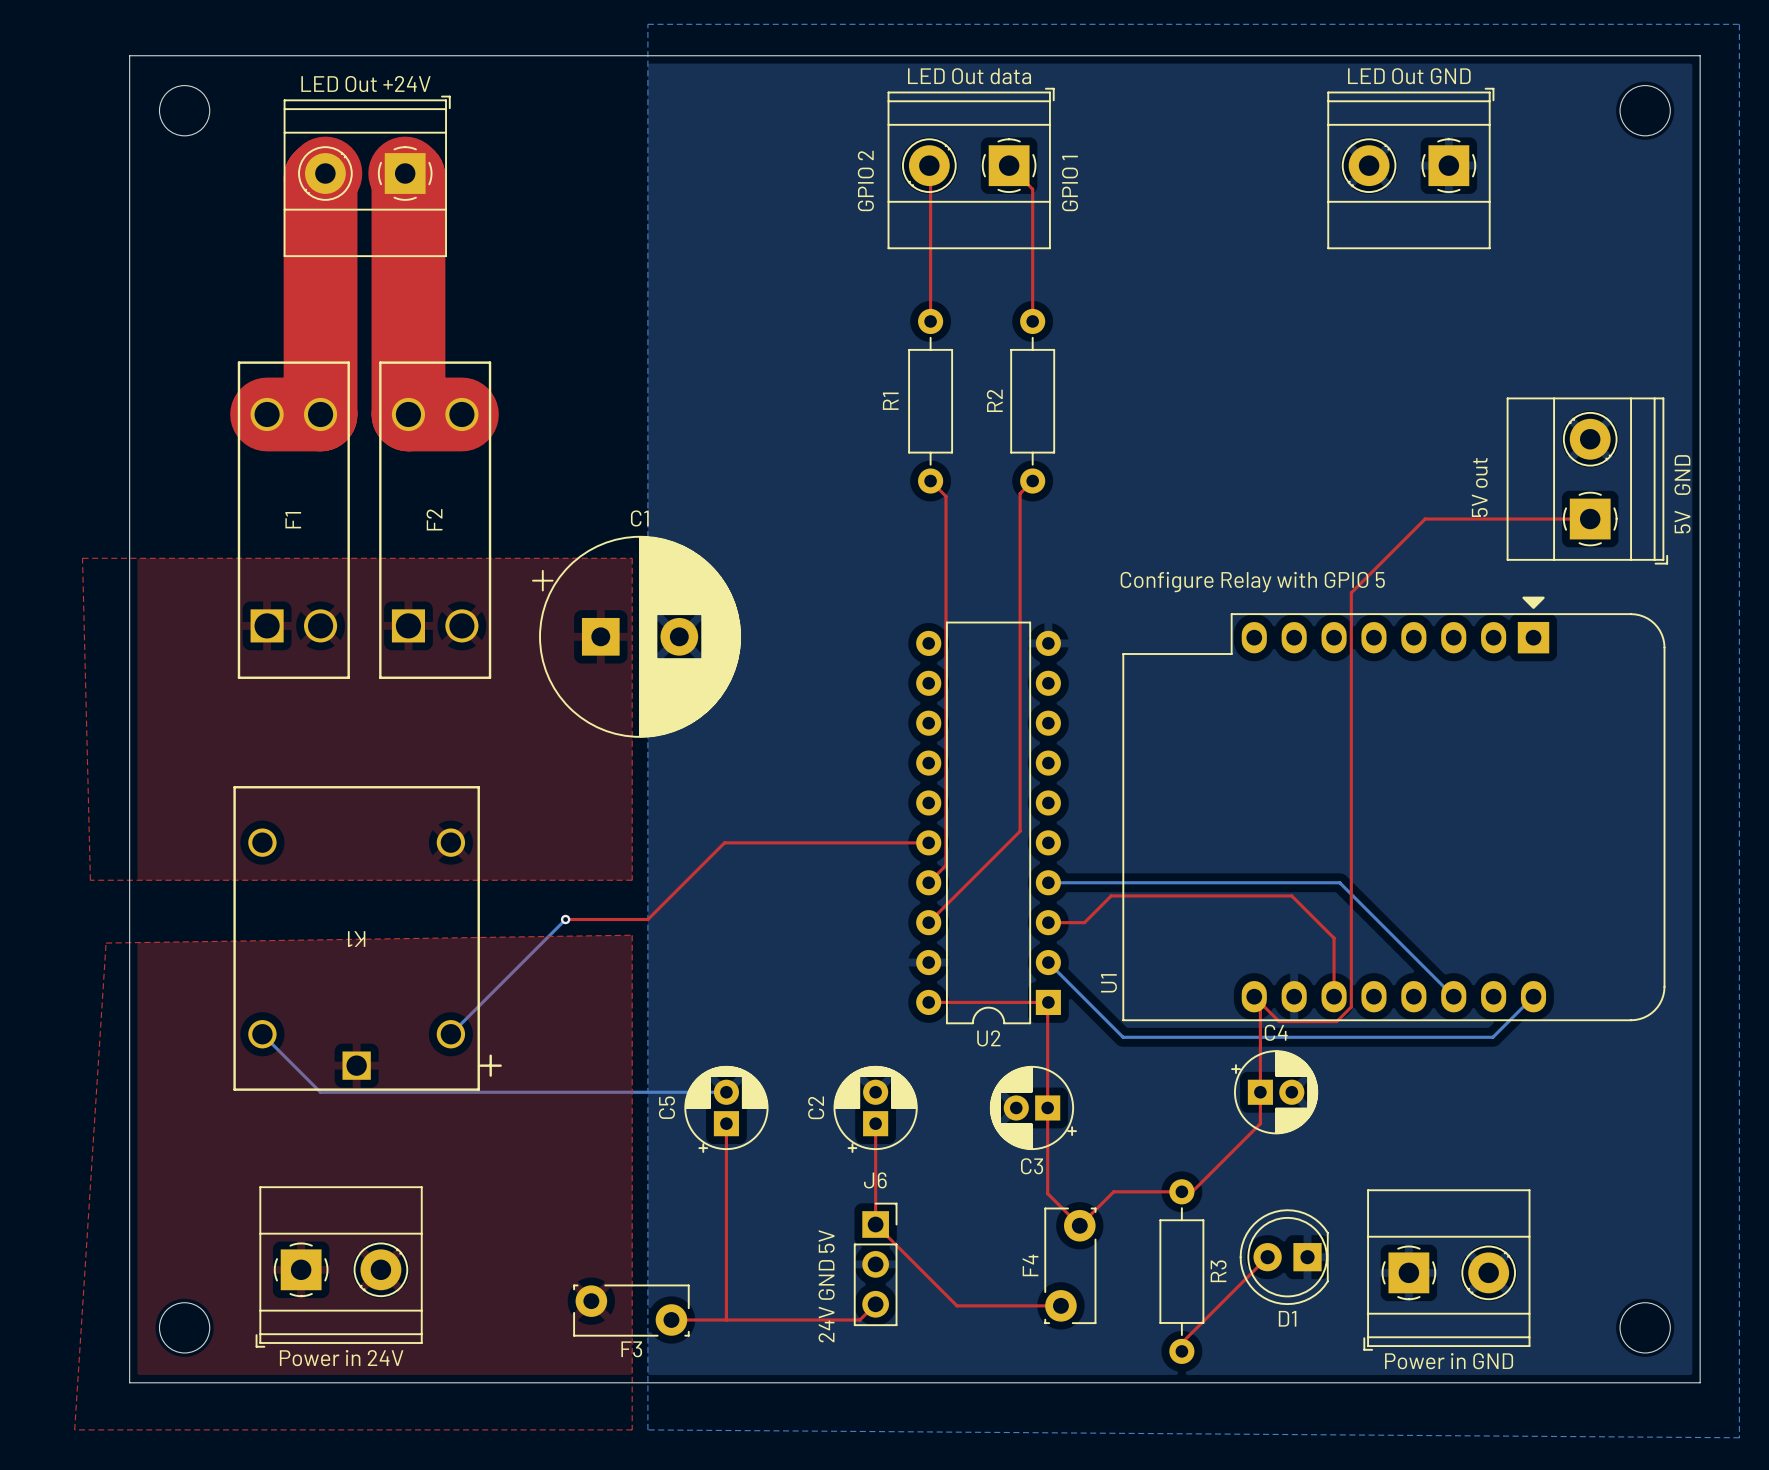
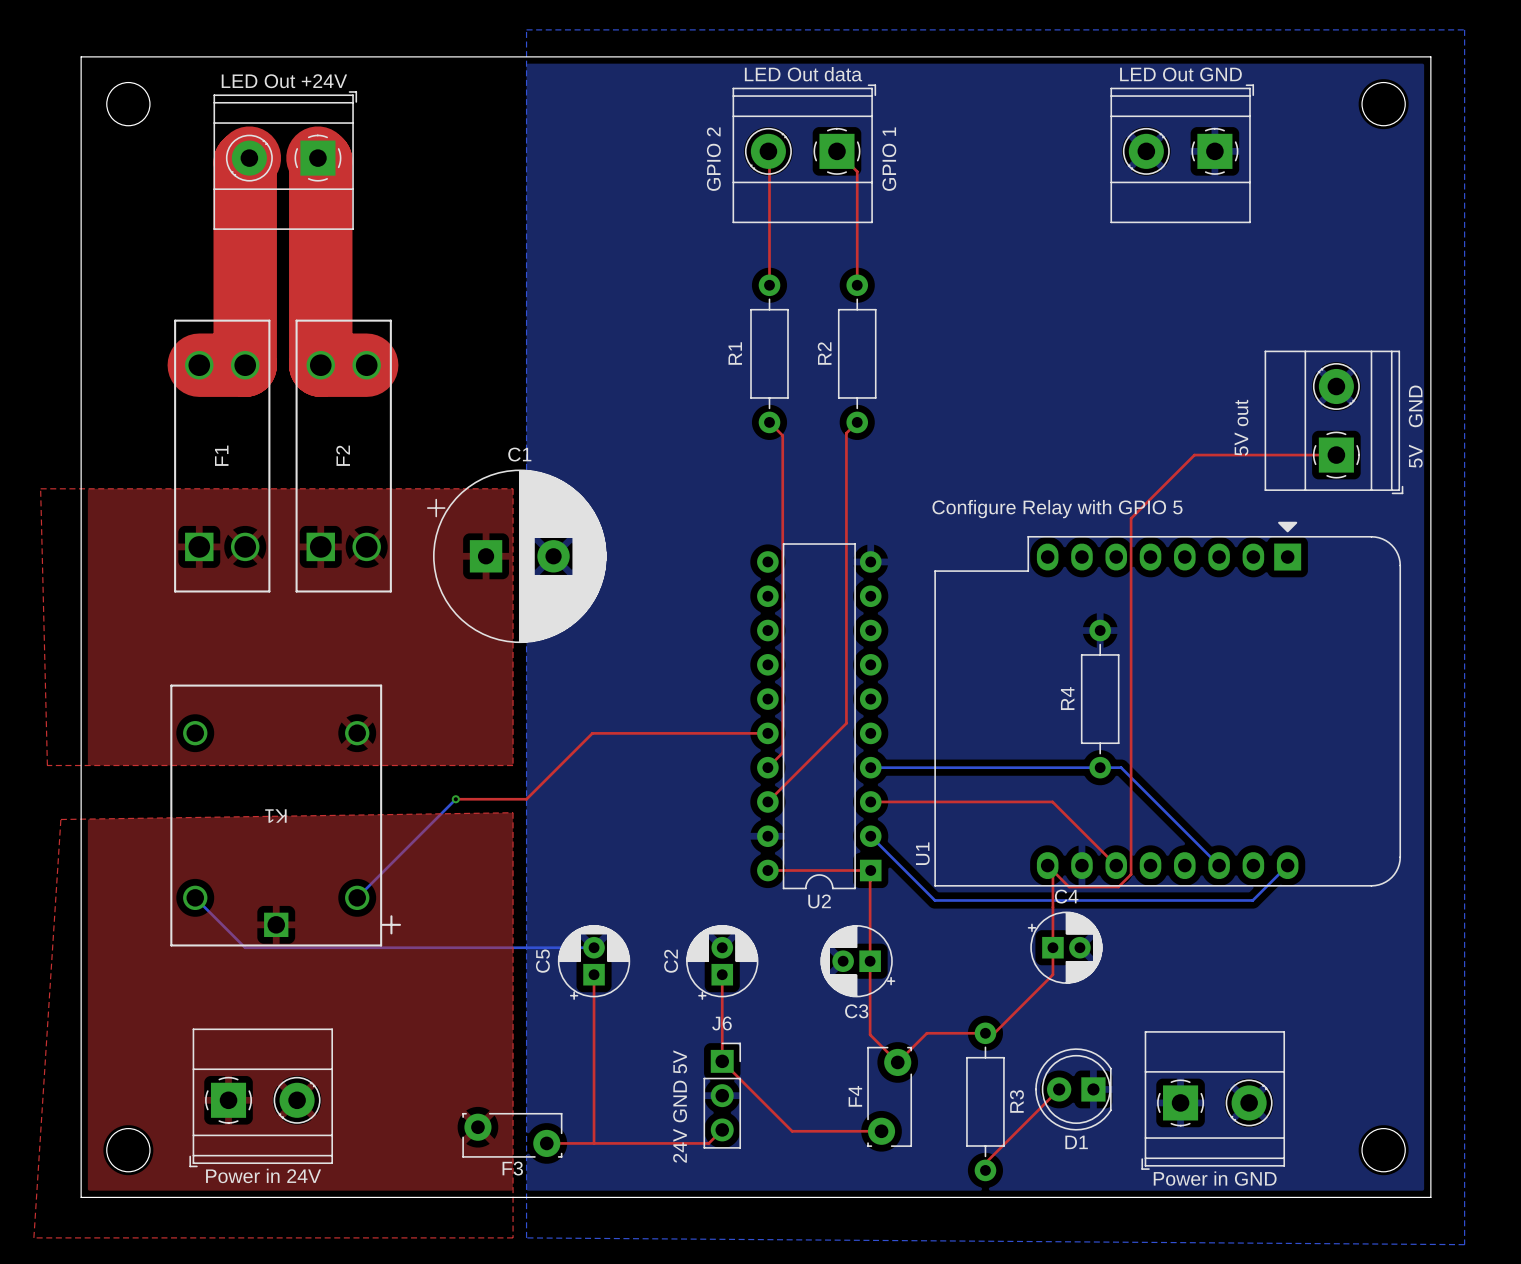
R4: none -> (1100, 699)
top track: (1084, 922) (1111, 895) (1291, 895) (1334, 938) (1334, 996) -> (901, 801) (1052, 801) (1116, 865)

